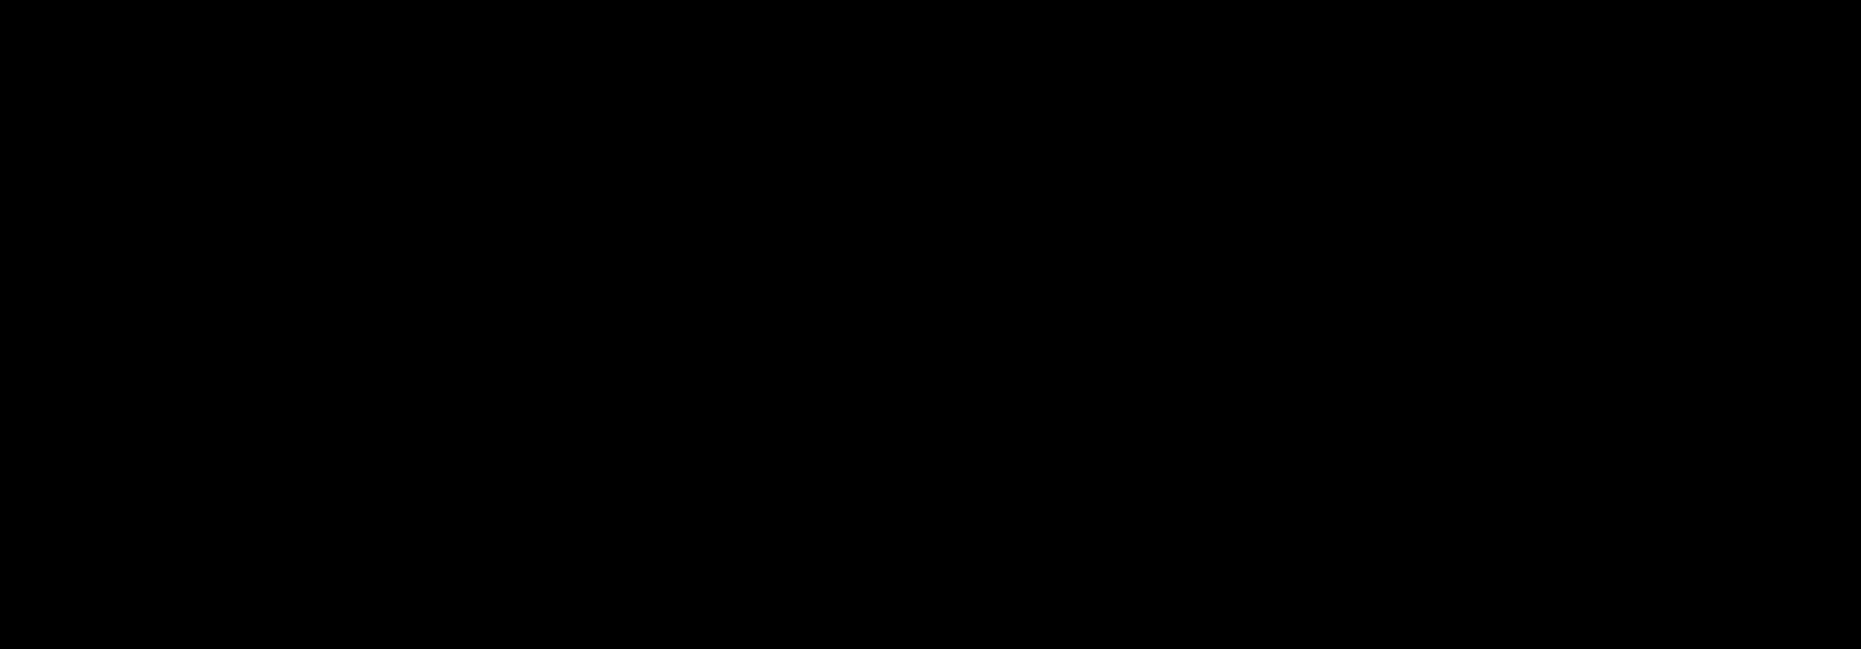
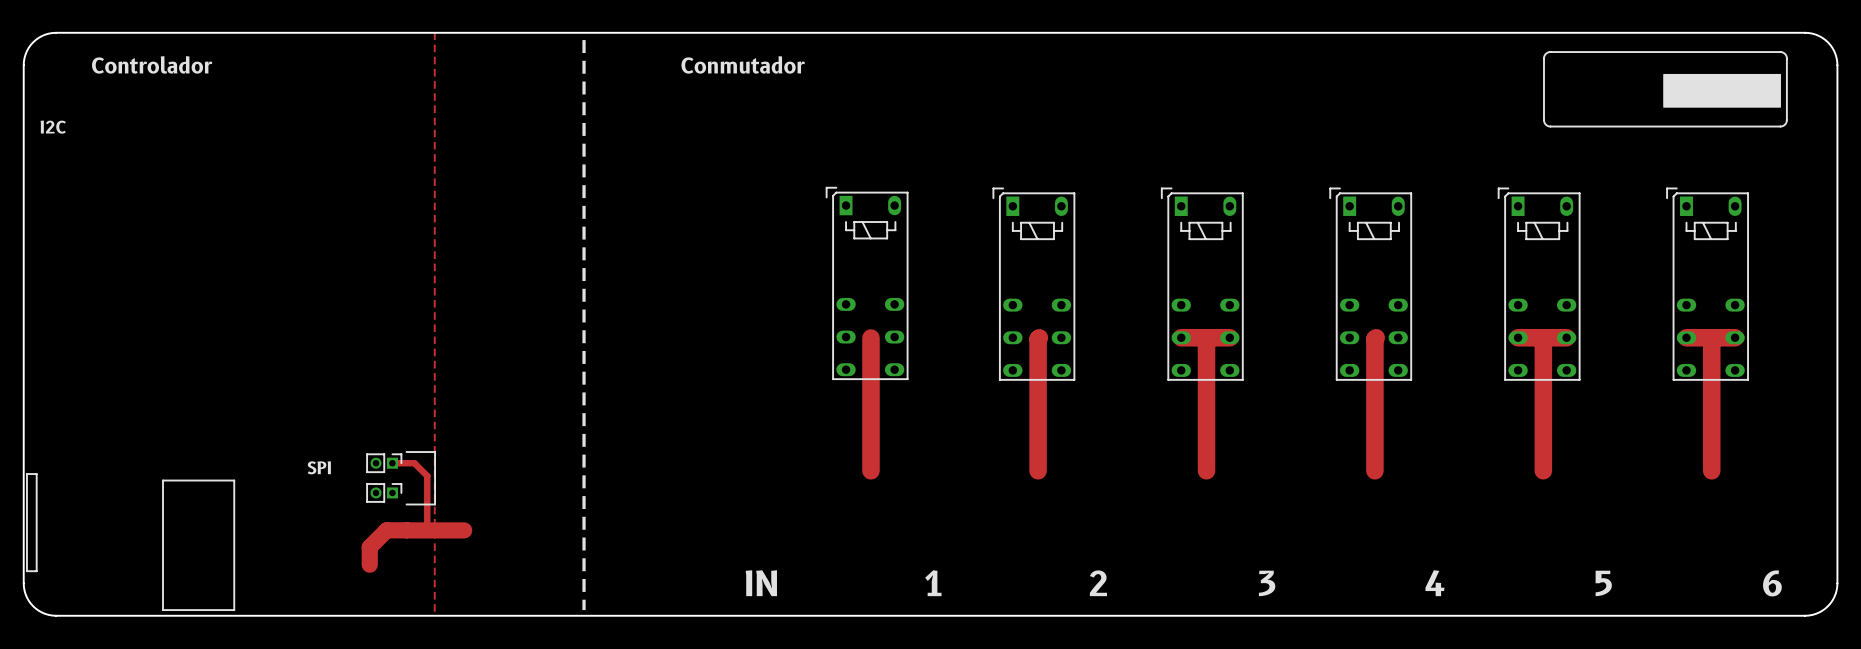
board edge: none -> (56, 32) (1805, 32) (1815, 34) (1830, 45) (1835, 54) (1837, 65) (1837, 583) (1835, 594) (1825, 608) (1815, 613) (1805, 615) (56, 615) (45, 613) (35, 608) (28, 600) (23, 583) (23, 65) (25, 54) (33, 42) (45, 34) (56, 32)
zone outline: none -> (434, 32) (434, 615)
line: none -> (584, 40) (584, 610)
line: none -> (1550, 52) (1782, 52) (1786, 57) (1786, 122) (1780, 126) (1548, 126) (1544, 120) (1543, 58) (1545, 53) (1550, 52)
text: none -> Controlador (152, 64)
text: none -> Conmutador (743, 64)
drawing: none -> [1663, 73, 1781, 108]
text: none -> I2C (53, 127)
part: none -> (867, 283)
part: none -> (1033, 284)
part: none -> (1202, 284)
part: none -> (1370, 284)
part: none -> (1539, 284)
part: none -> (1707, 284)
track: none -> (1039, 337) (1038, 470)
track: none -> (1181, 337) (1229, 337)
track: none -> (1207, 337) (1206, 470)
track: none -> (1376, 337) (1374, 470)
track: none -> (1518, 337) (1566, 337)
track: none -> (1544, 337) (1543, 470)
track: none -> (1686, 337) (1735, 337)
track: none -> (1713, 337) (1711, 470)
track: none -> (870, 338) (870, 470)
line: none -> (406, 452) (435, 452) (435, 504) (406, 504)
part: none -> (384, 463)
track: none -> (392, 463) (414, 463) (427, 475) (427, 530) (406, 530) (464, 530)
text: none -> SPI (319, 467)
line: none -> (26, 474) (36, 474) (36, 571) (26, 571) (26, 474)
line: none -> (162, 480) (234, 480) (234, 610) (162, 610) (162, 480)
part: none -> (384, 492)
track: none -> (406, 530) (386, 530) (369, 547) (369, 564)
text: none -> 2 (1098, 583)
text: none -> IN (761, 583)
text: none -> 1 (933, 583)
text: none -> 3 (1267, 583)
text: none -> 4 (1434, 583)
text: none -> 5 (1603, 583)
text: none -> 6 (1772, 583)

